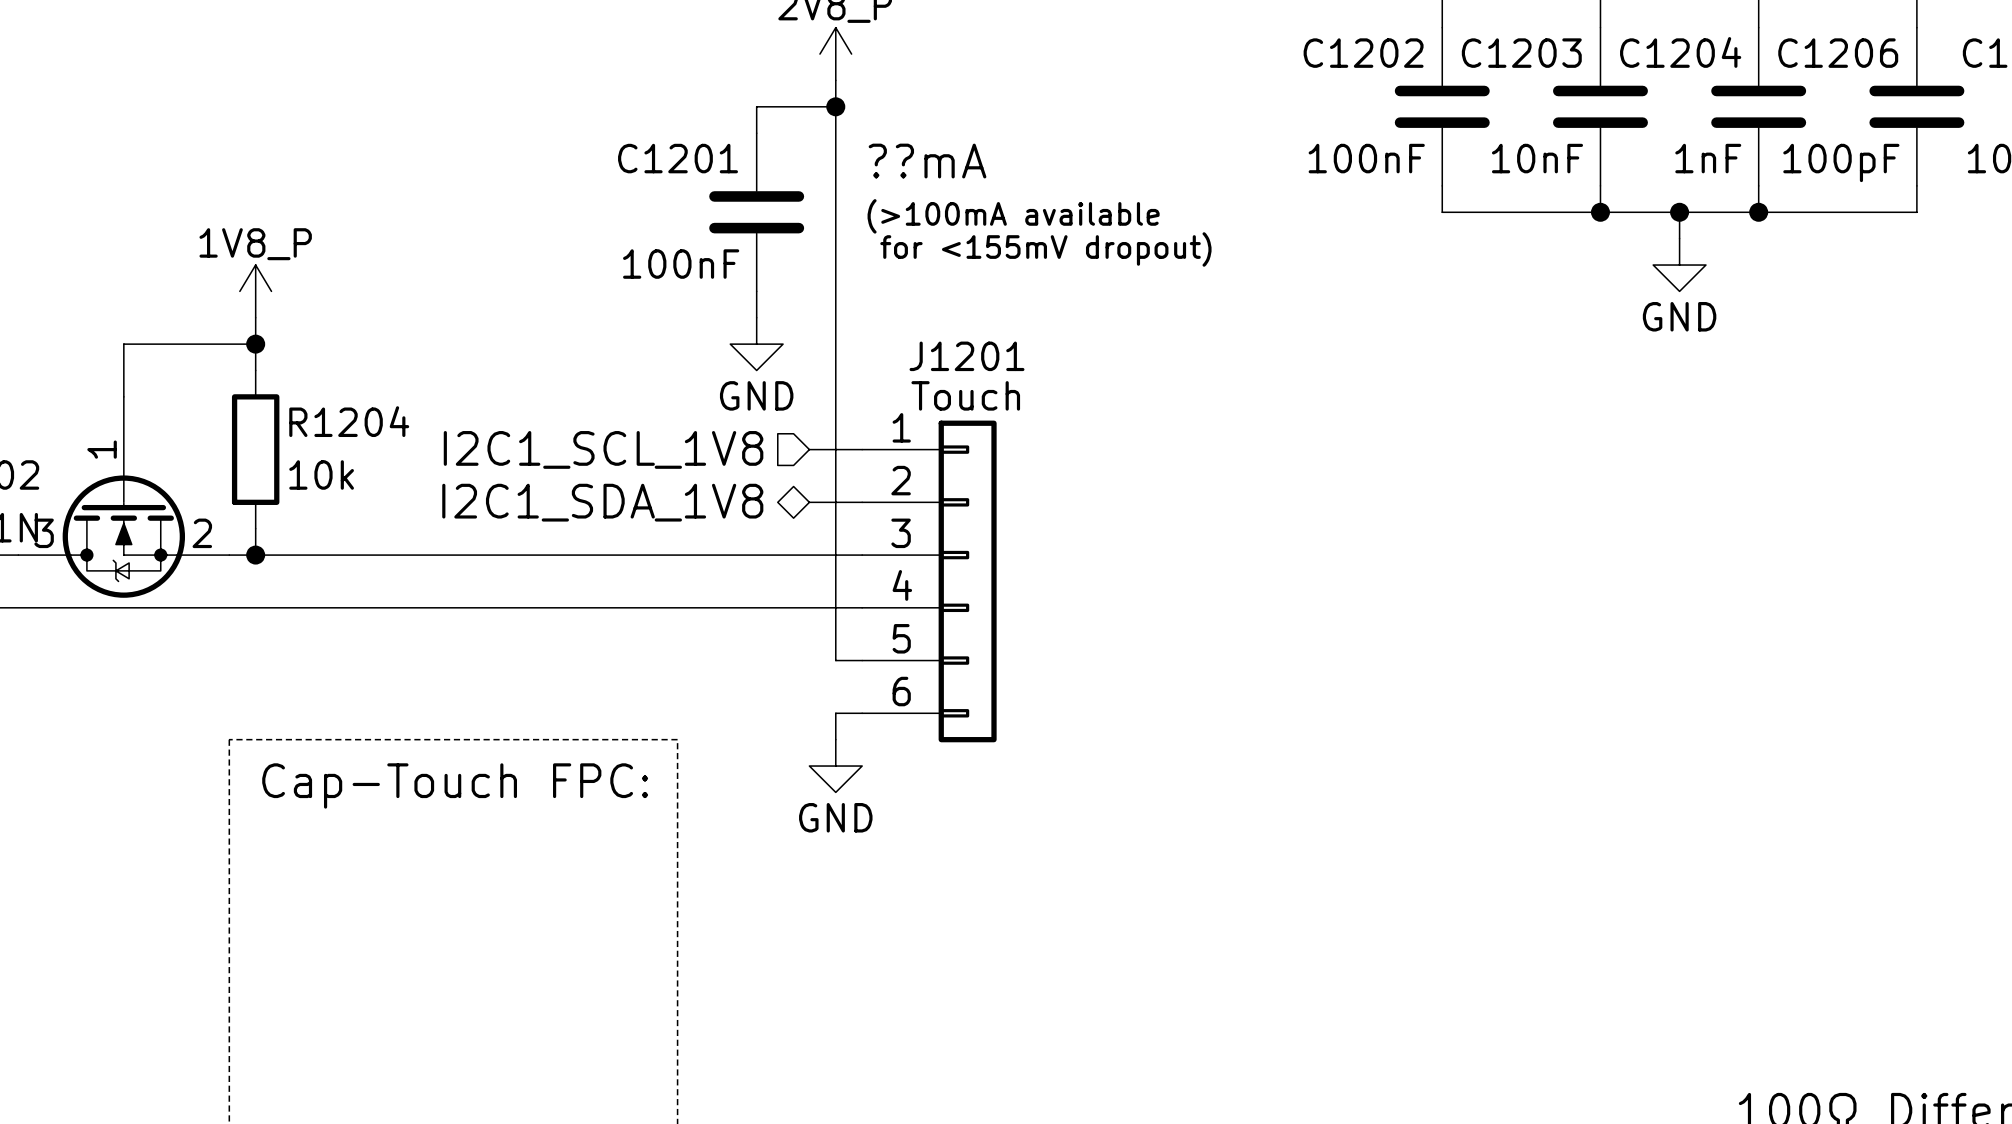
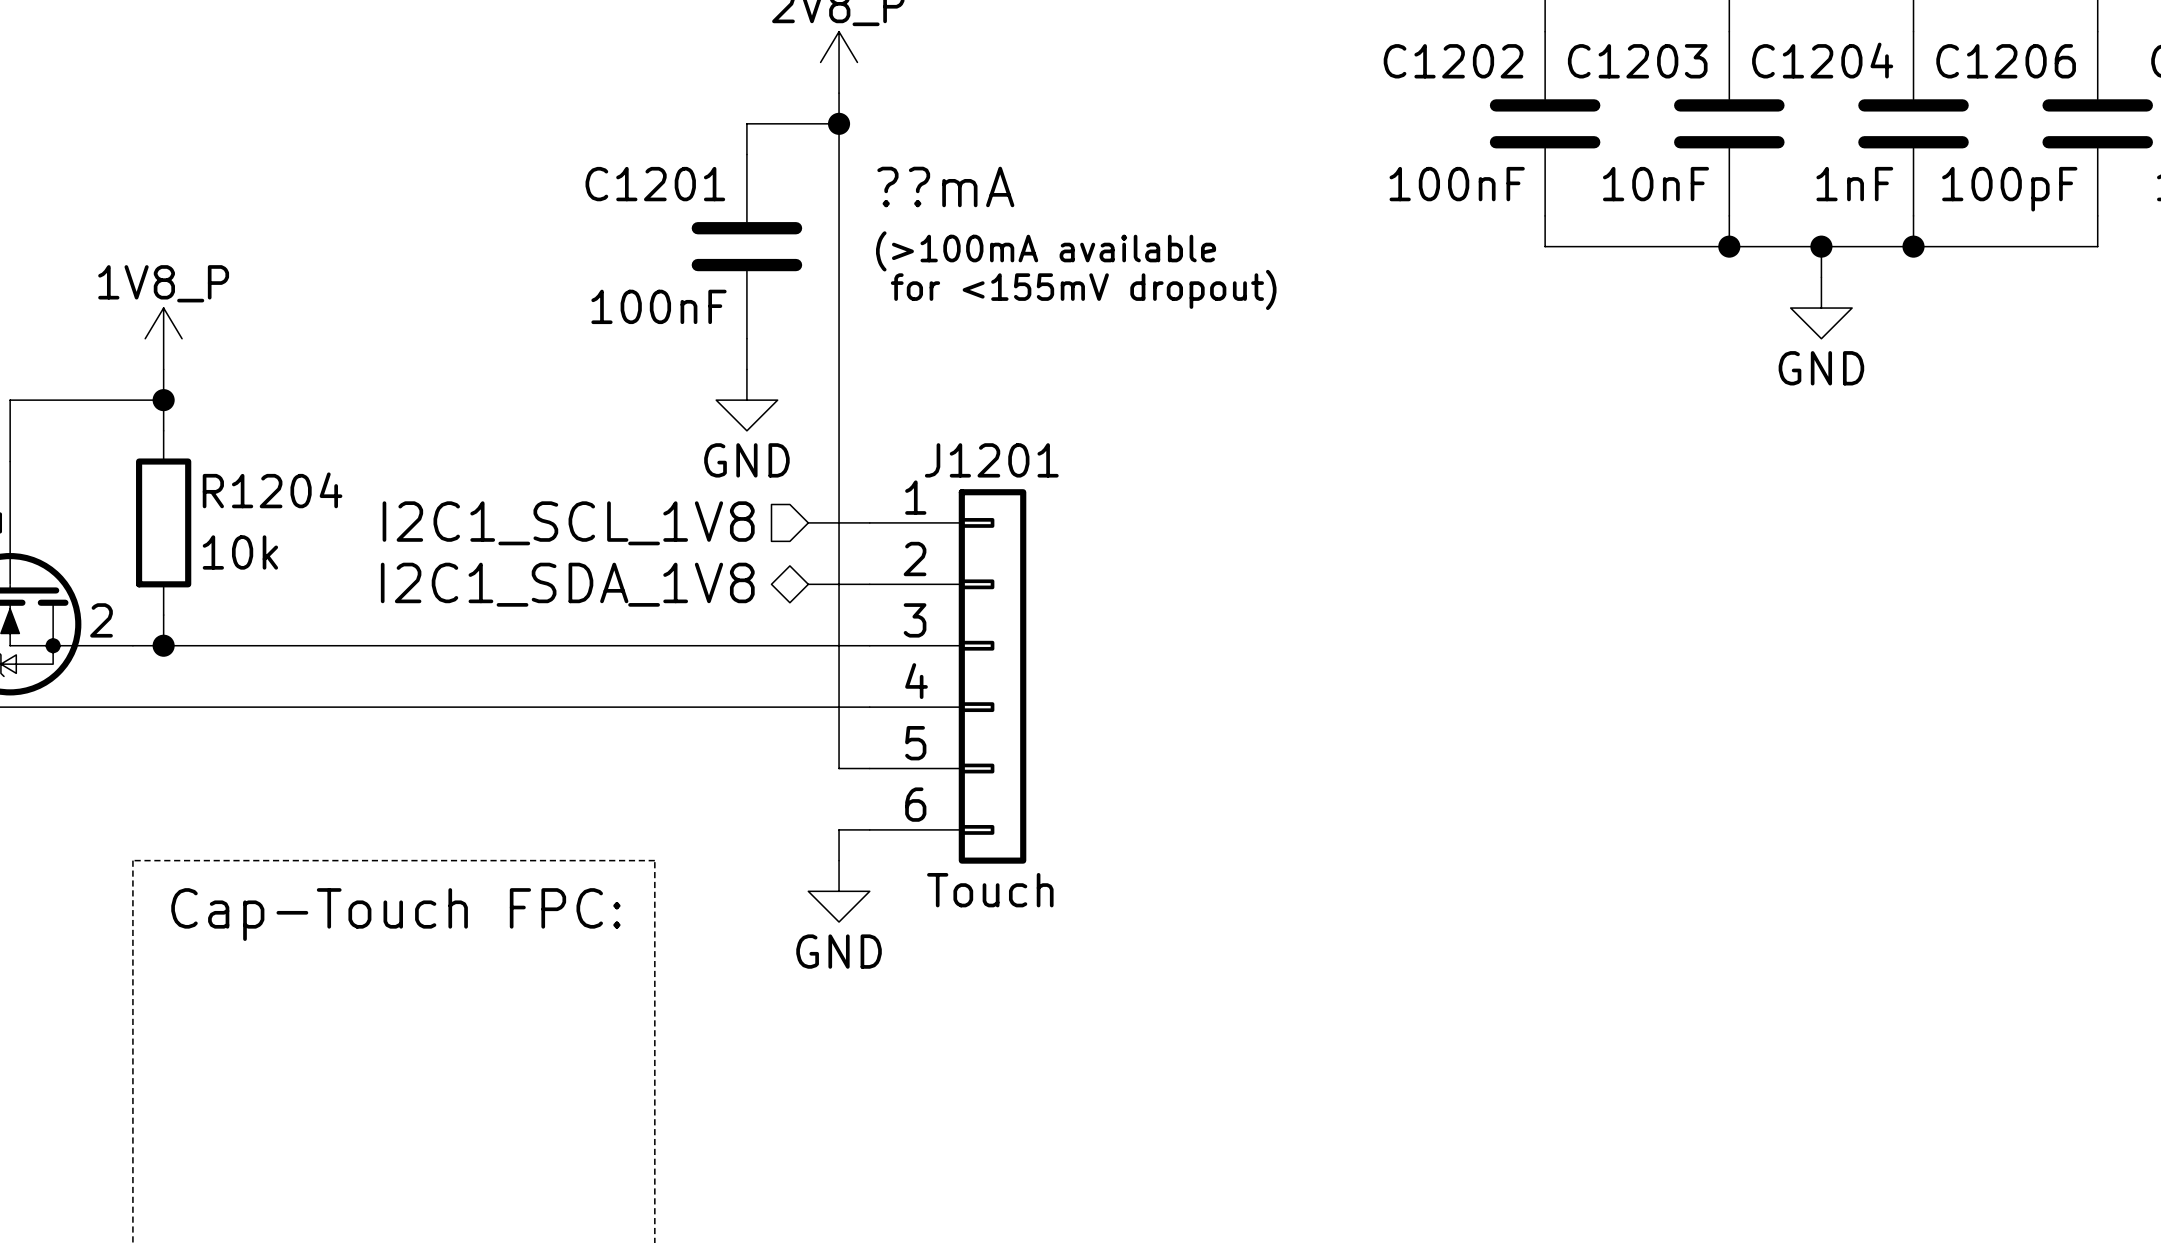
J1201 name position: J1201 (967, 356) -> J1201 (991, 460)
J1201 value position: Touch (965, 395) -> Touch (990, 890)

